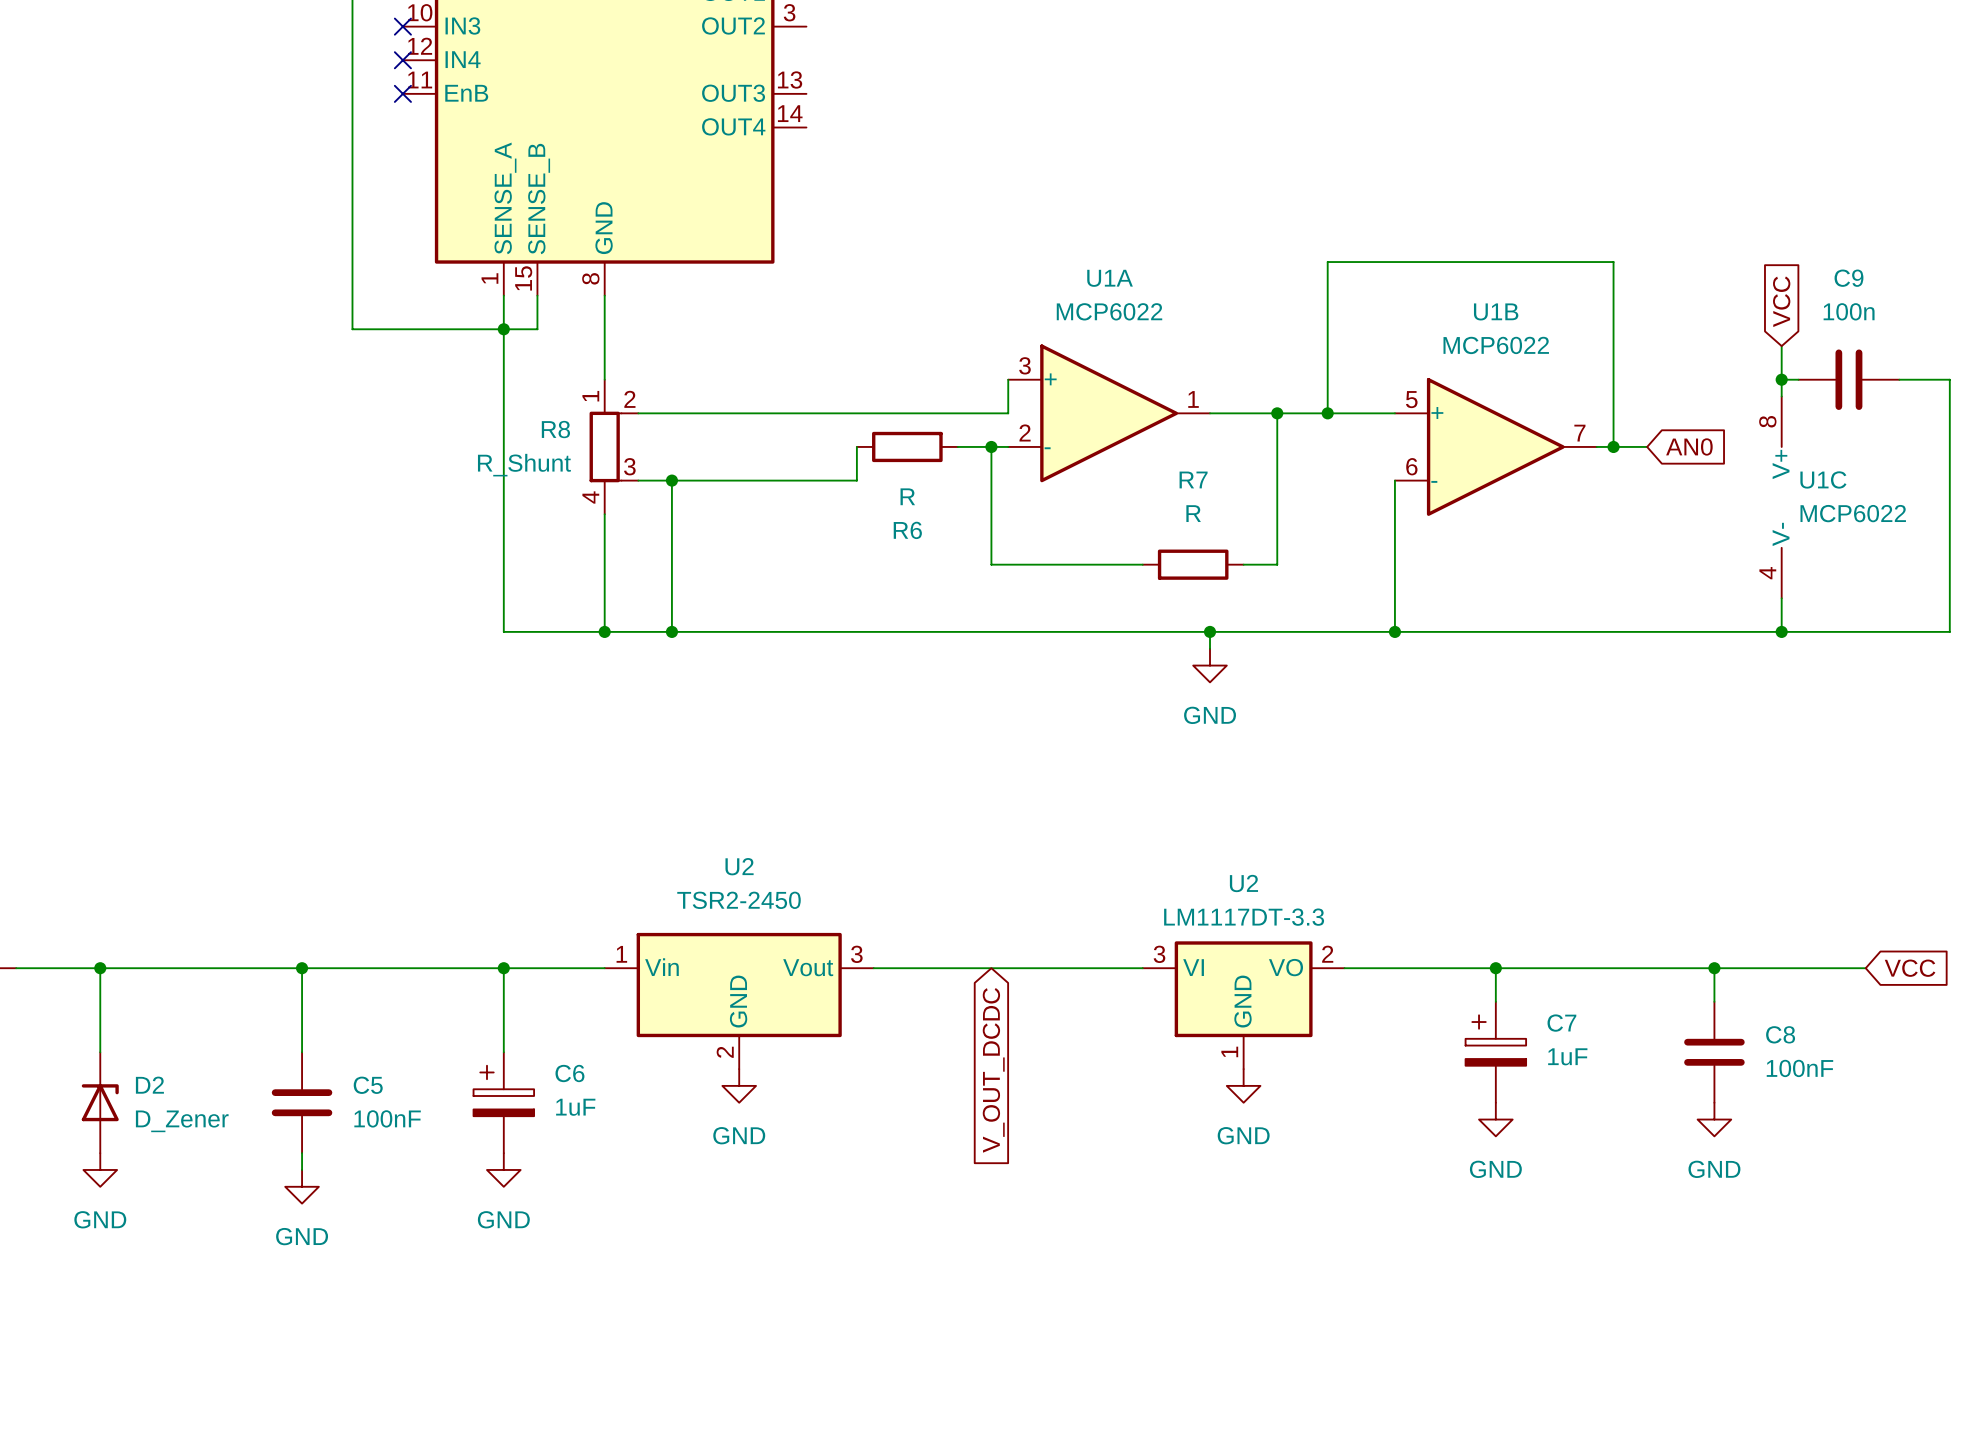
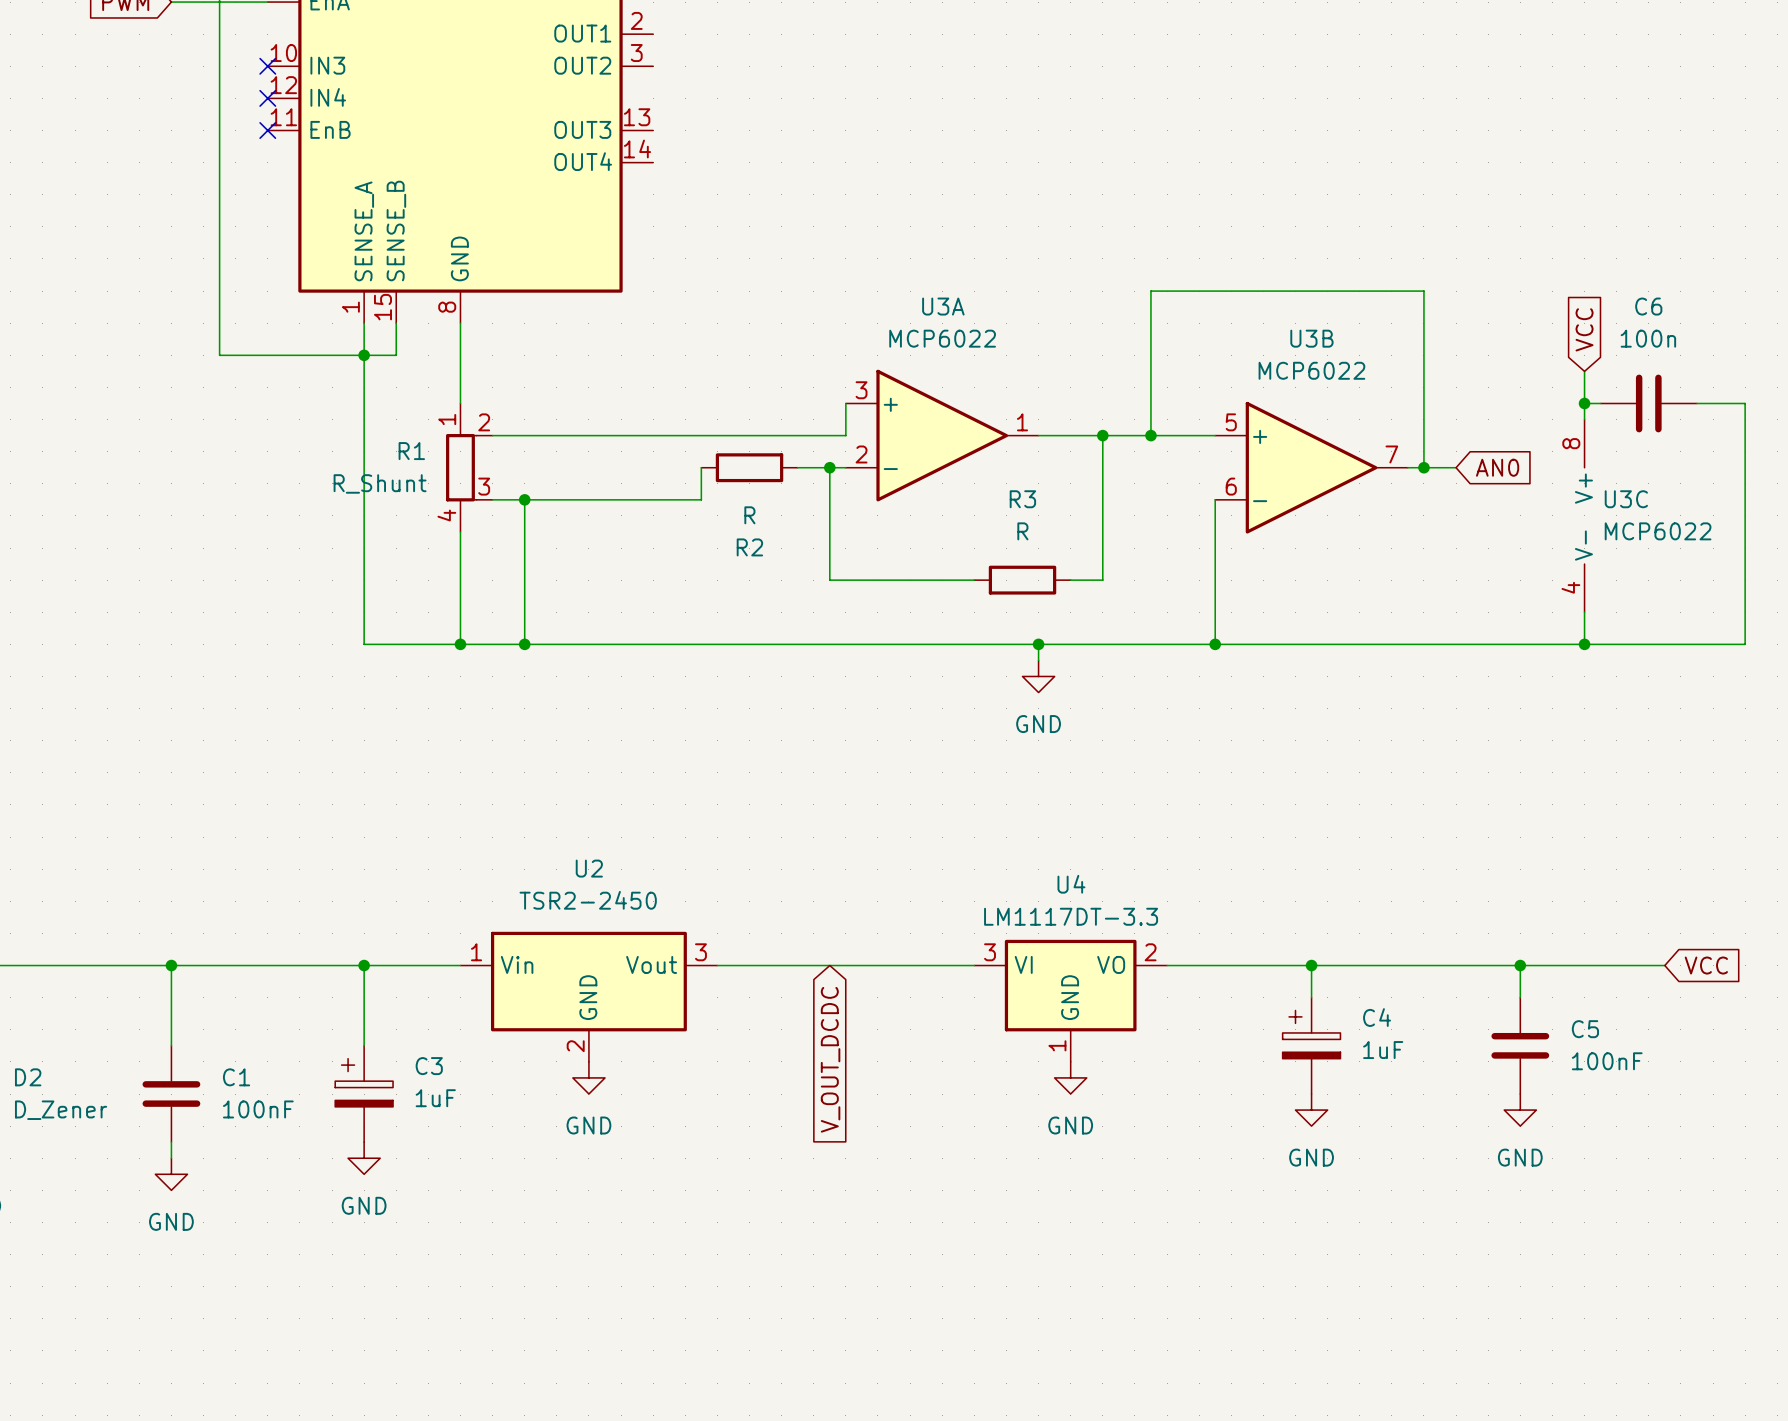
U1A name: U1A (1110, 278) -> U3A (943, 306)
C9 name: C9 (1848, 278) -> C6 (1648, 306)
U1B name: U1B (1496, 311) -> U3B (1311, 338)
R8 name: R8 (555, 429) -> R1 (411, 451)
R7 name: R7 (1193, 479) -> R3 (1022, 499)
U1C name: U1C (1823, 479) -> U3C (1626, 499)
R6 name: R6 (907, 530) -> R2 (749, 547)
U2 name: U2 (1243, 883) -> U4 (1071, 884)
C7 name: C7 (1561, 1023) -> C4 (1377, 1017)
C8 name: C8 (1780, 1034) -> C5 (1585, 1029)
C6 name: C6 (569, 1073) -> C3 (429, 1066)
C5 name: C5 (368, 1085) -> C1 (236, 1077)

